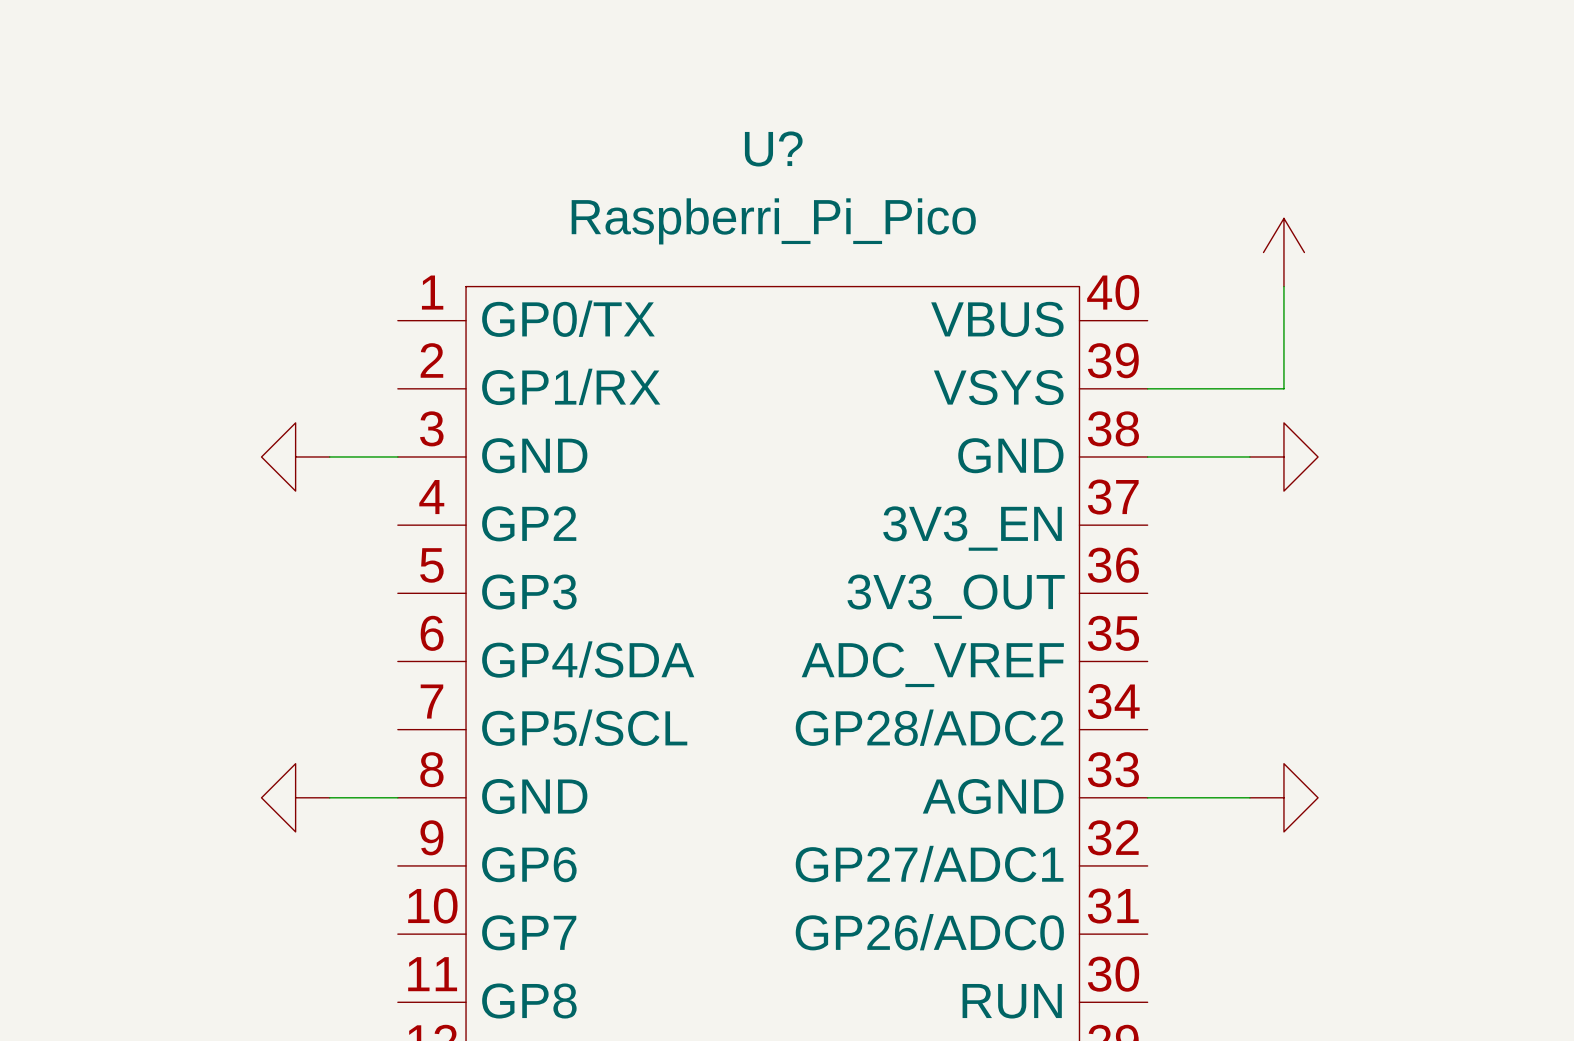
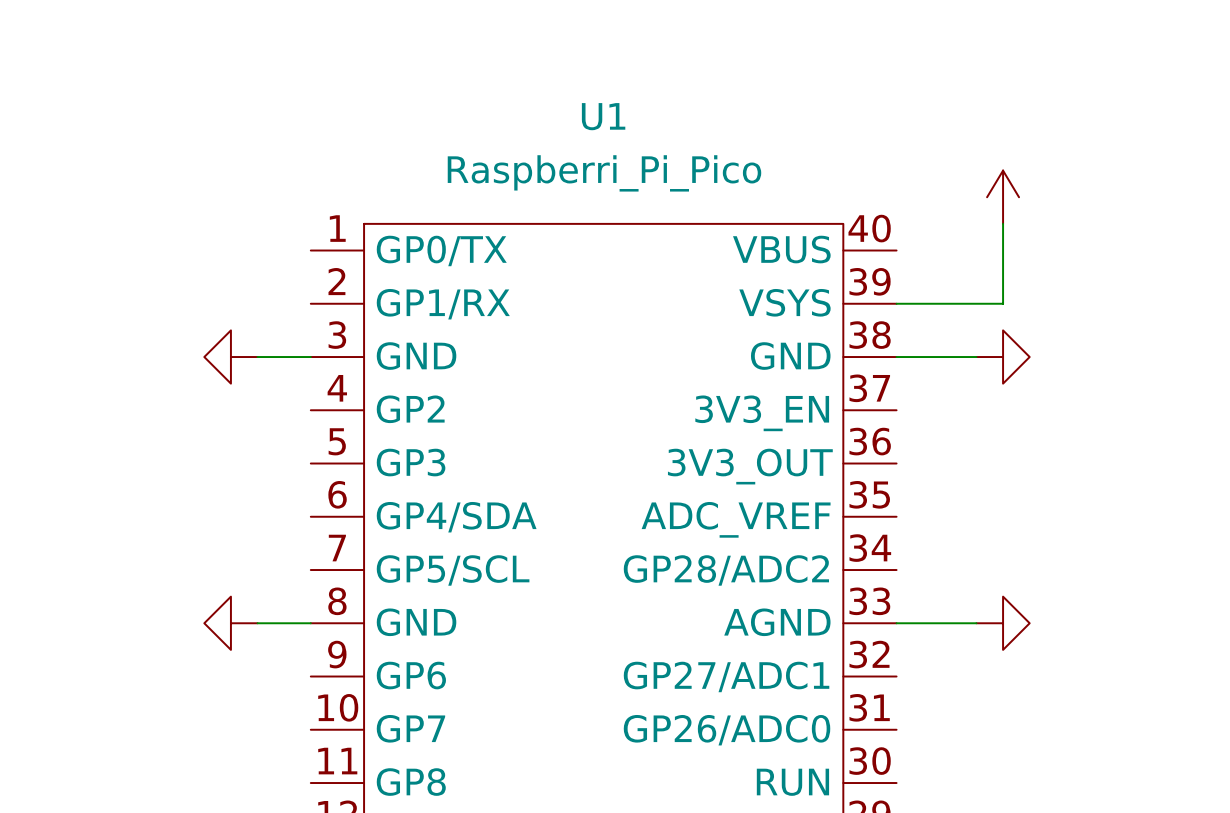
U? name: U? (773, 148) -> U1 (603, 116)

